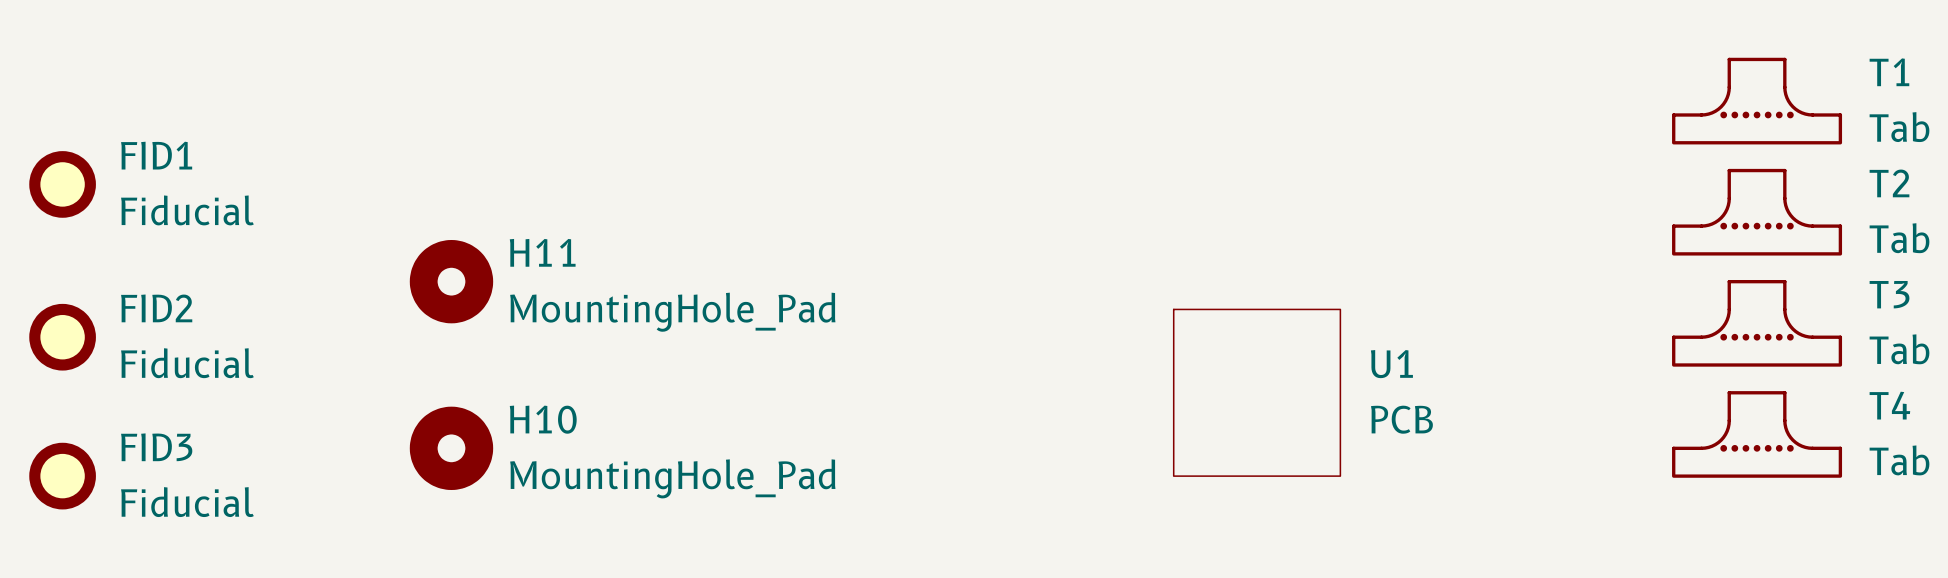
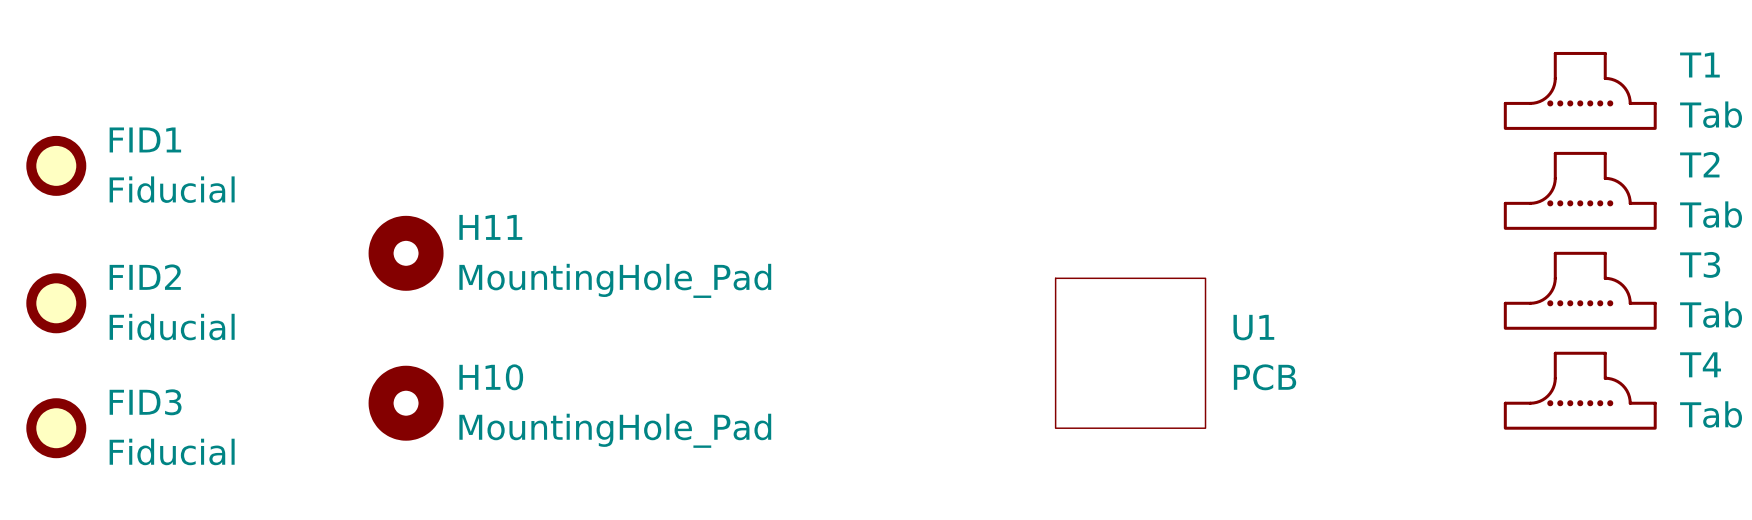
T1 symbol: [1672, 57, 1843, 145] -> [1503, 51, 1657, 130]
T2 symbol: [1672, 168, 1843, 256] -> [1503, 151, 1657, 230]
T3 symbol: [1672, 279, 1843, 367] -> [1503, 251, 1657, 330]
T4 symbol: [1672, 391, 1843, 478] -> [1503, 351, 1657, 430]

